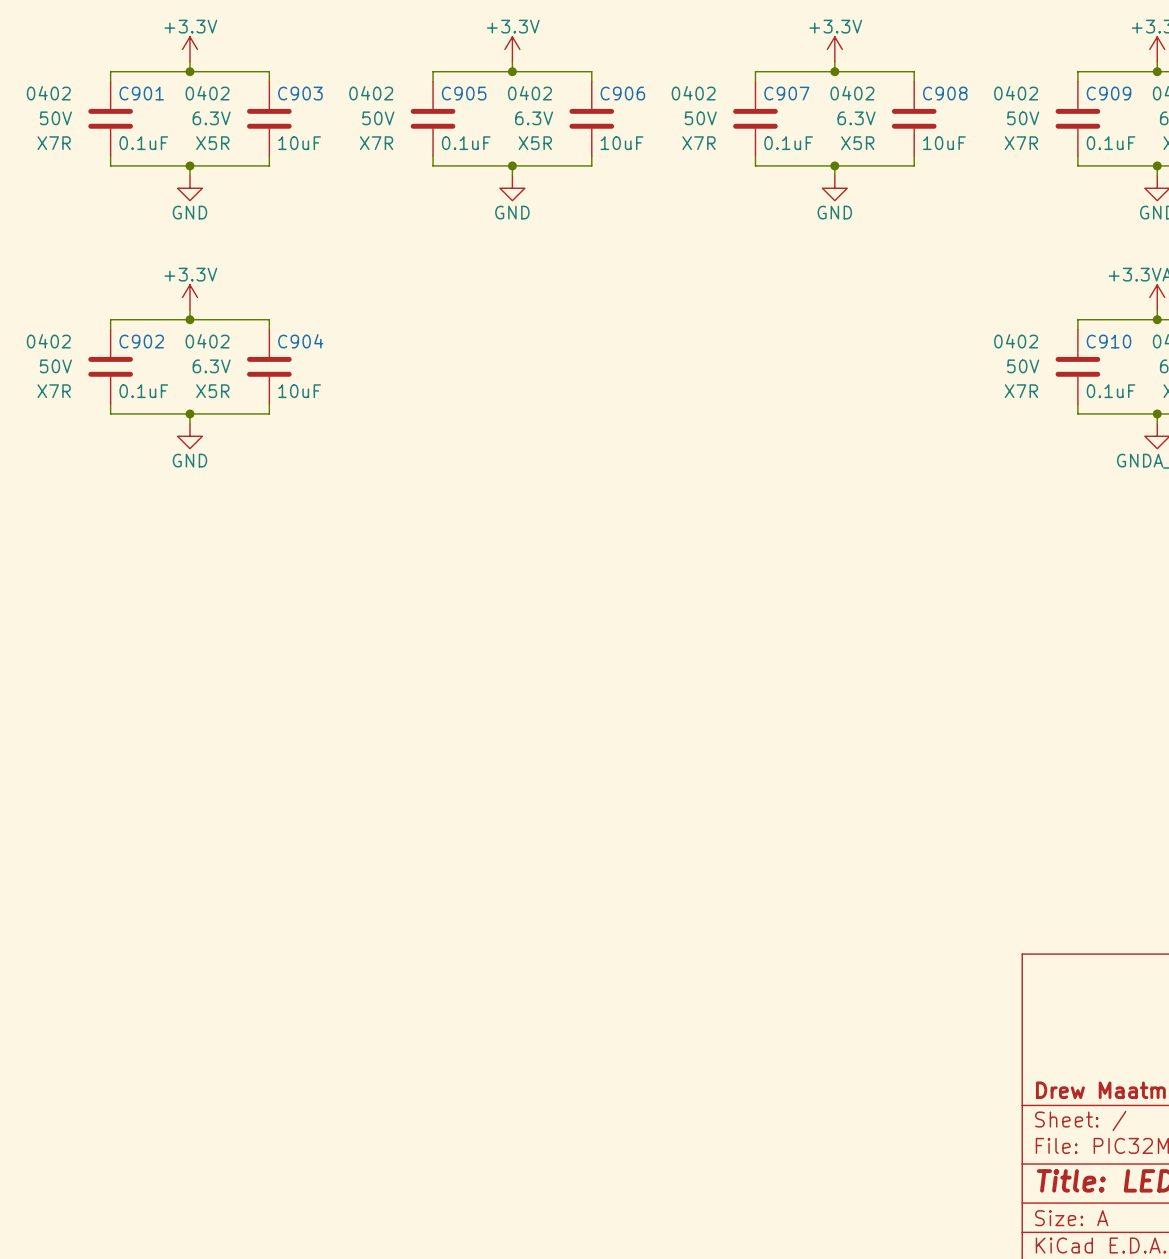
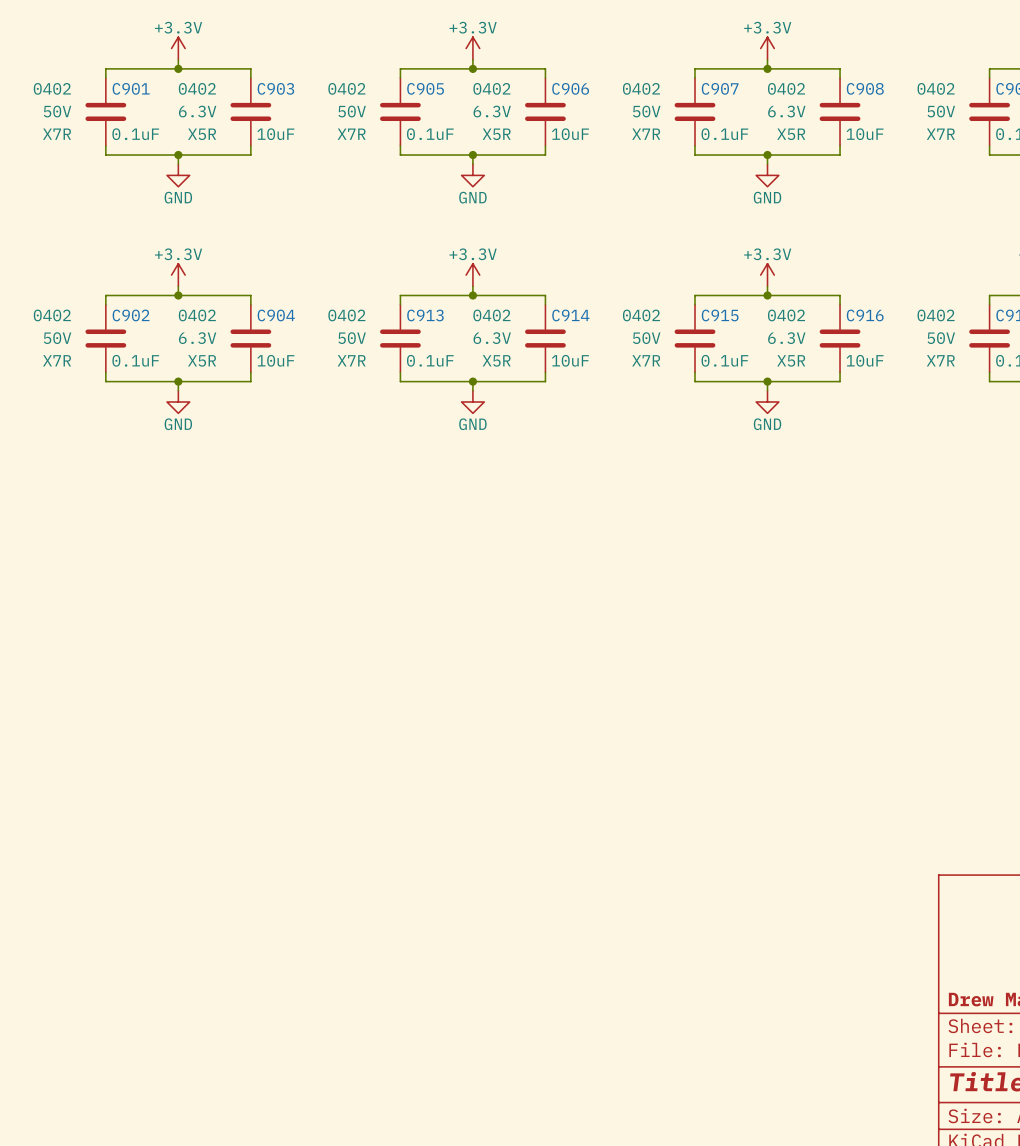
power symbol: none -> +3.3V (472, 275)
power symbol: none -> +3.3V (767, 275)
wire: none -> (472, 286) (472, 295)
wire: none -> (767, 286) (767, 295)
junction: none -> (472, 295)
junction: none -> (767, 295)
wire: none -> (400, 304) (400, 295) (545, 295) (545, 304)
wire: none -> (694, 304) (694, 295) (840, 295) (840, 304)
C913: none -> 0.1uF (400, 338)
C914: none -> 10uF (545, 338)
C915: none -> 0.1uF (694, 338)
C916: none -> 10uF (840, 338)
wire: none -> (400, 372) (400, 381) (545, 381) (545, 372)
wire: none -> (694, 372) (694, 381) (840, 381) (840, 372)
wire: none -> (472, 381) (472, 390)
junction: none -> (472, 381)
wire: none -> (767, 381) (767, 390)
junction: none -> (767, 381)
power symbol: none -> GND (472, 402)
power symbol: none -> GND (767, 402)

